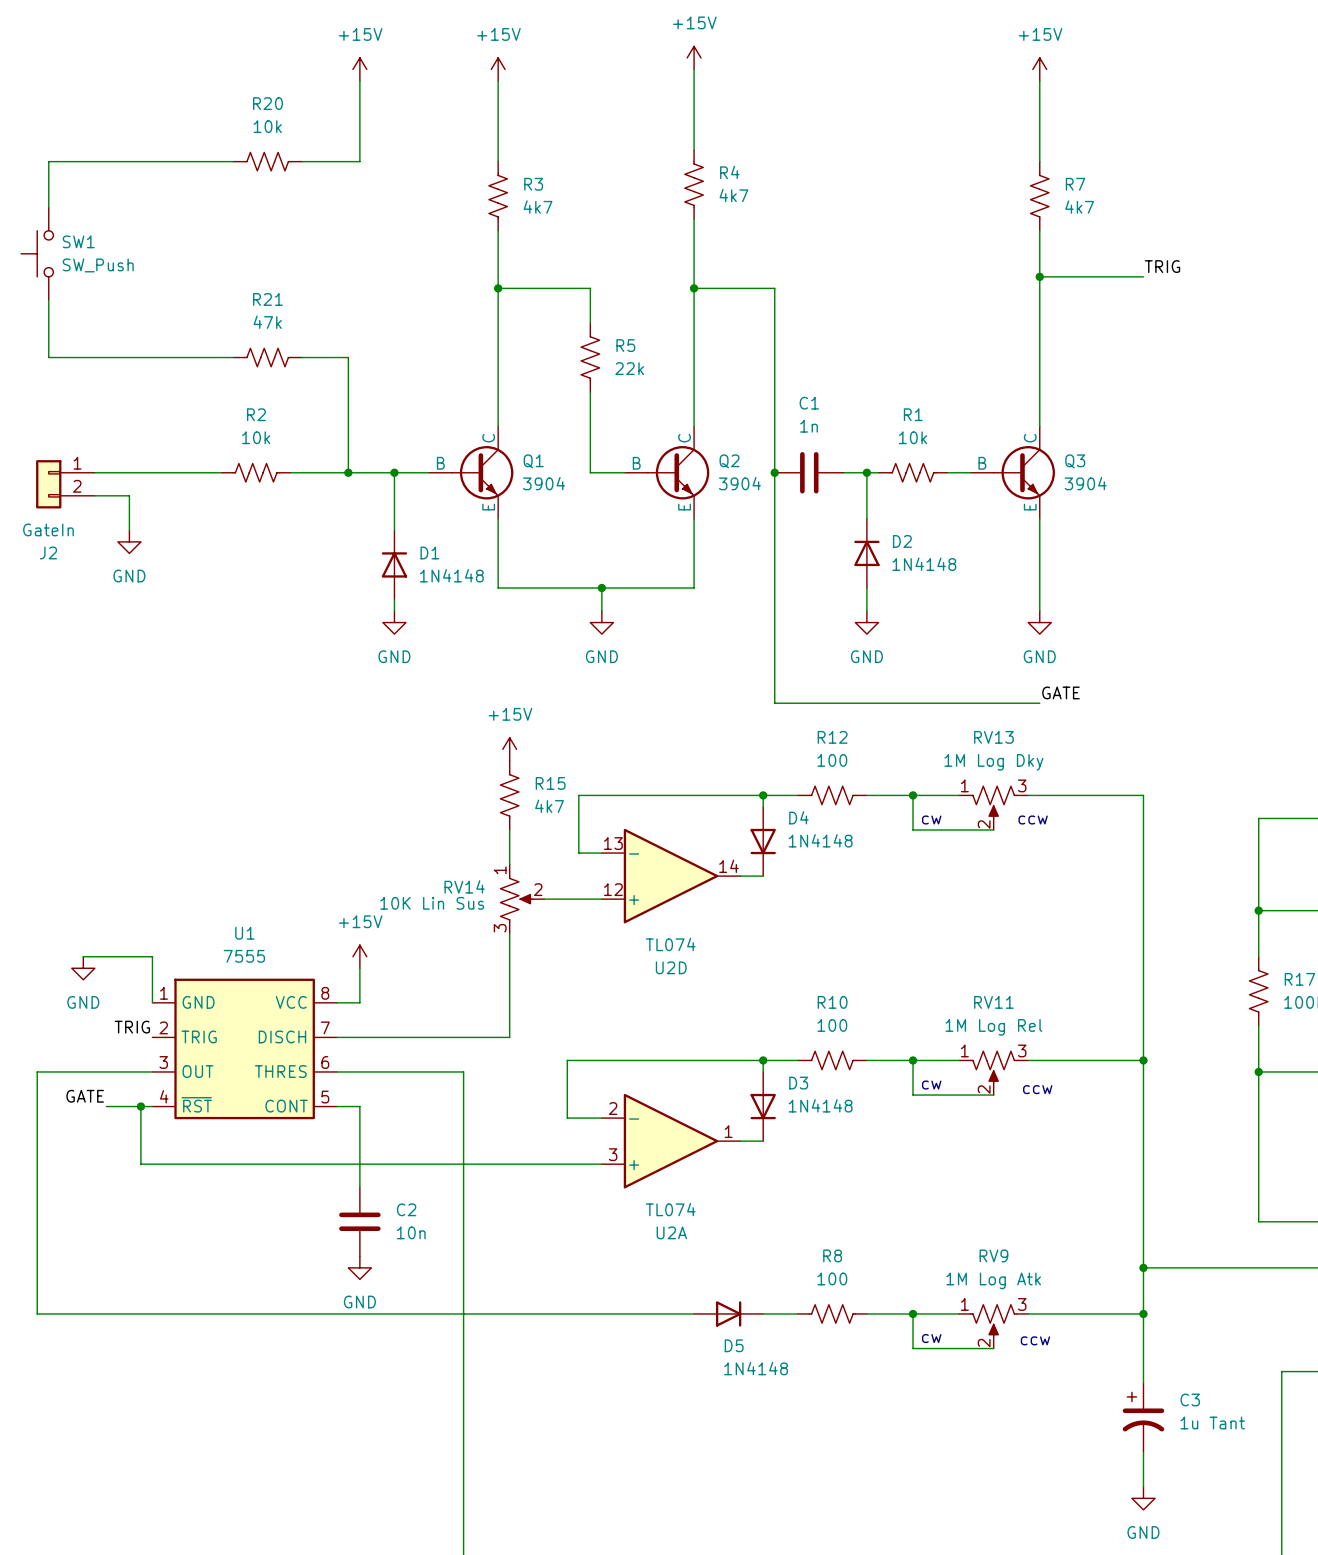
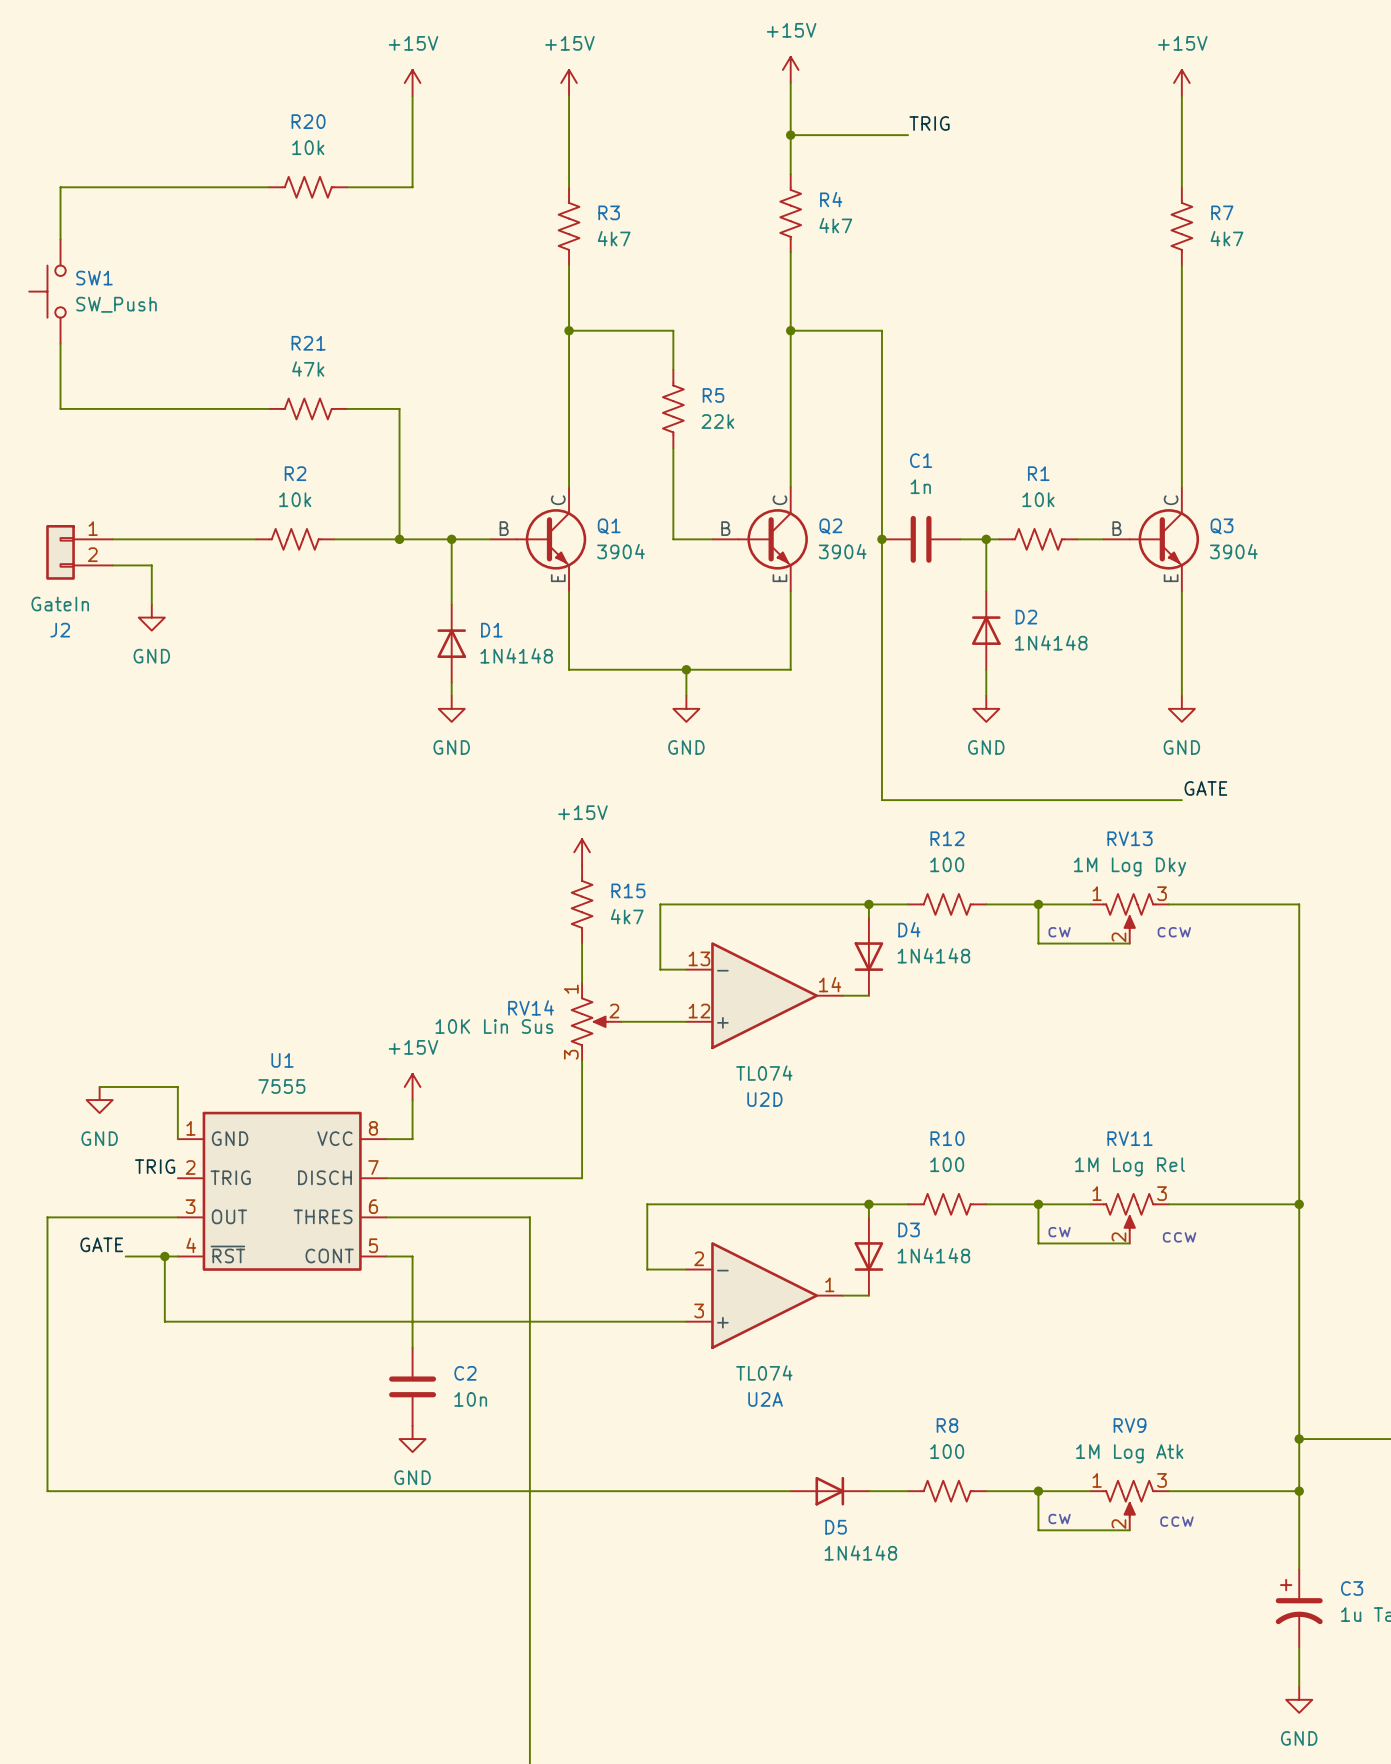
label: none -> TRIG (929, 123)
wire: none -> (790, 135) (908, 135)
junction: none -> (790, 135)
label: TRIG (1162, 266) -> none
wire: (1039, 276) (1143, 276) -> none
junction: (1039, 276) -> none

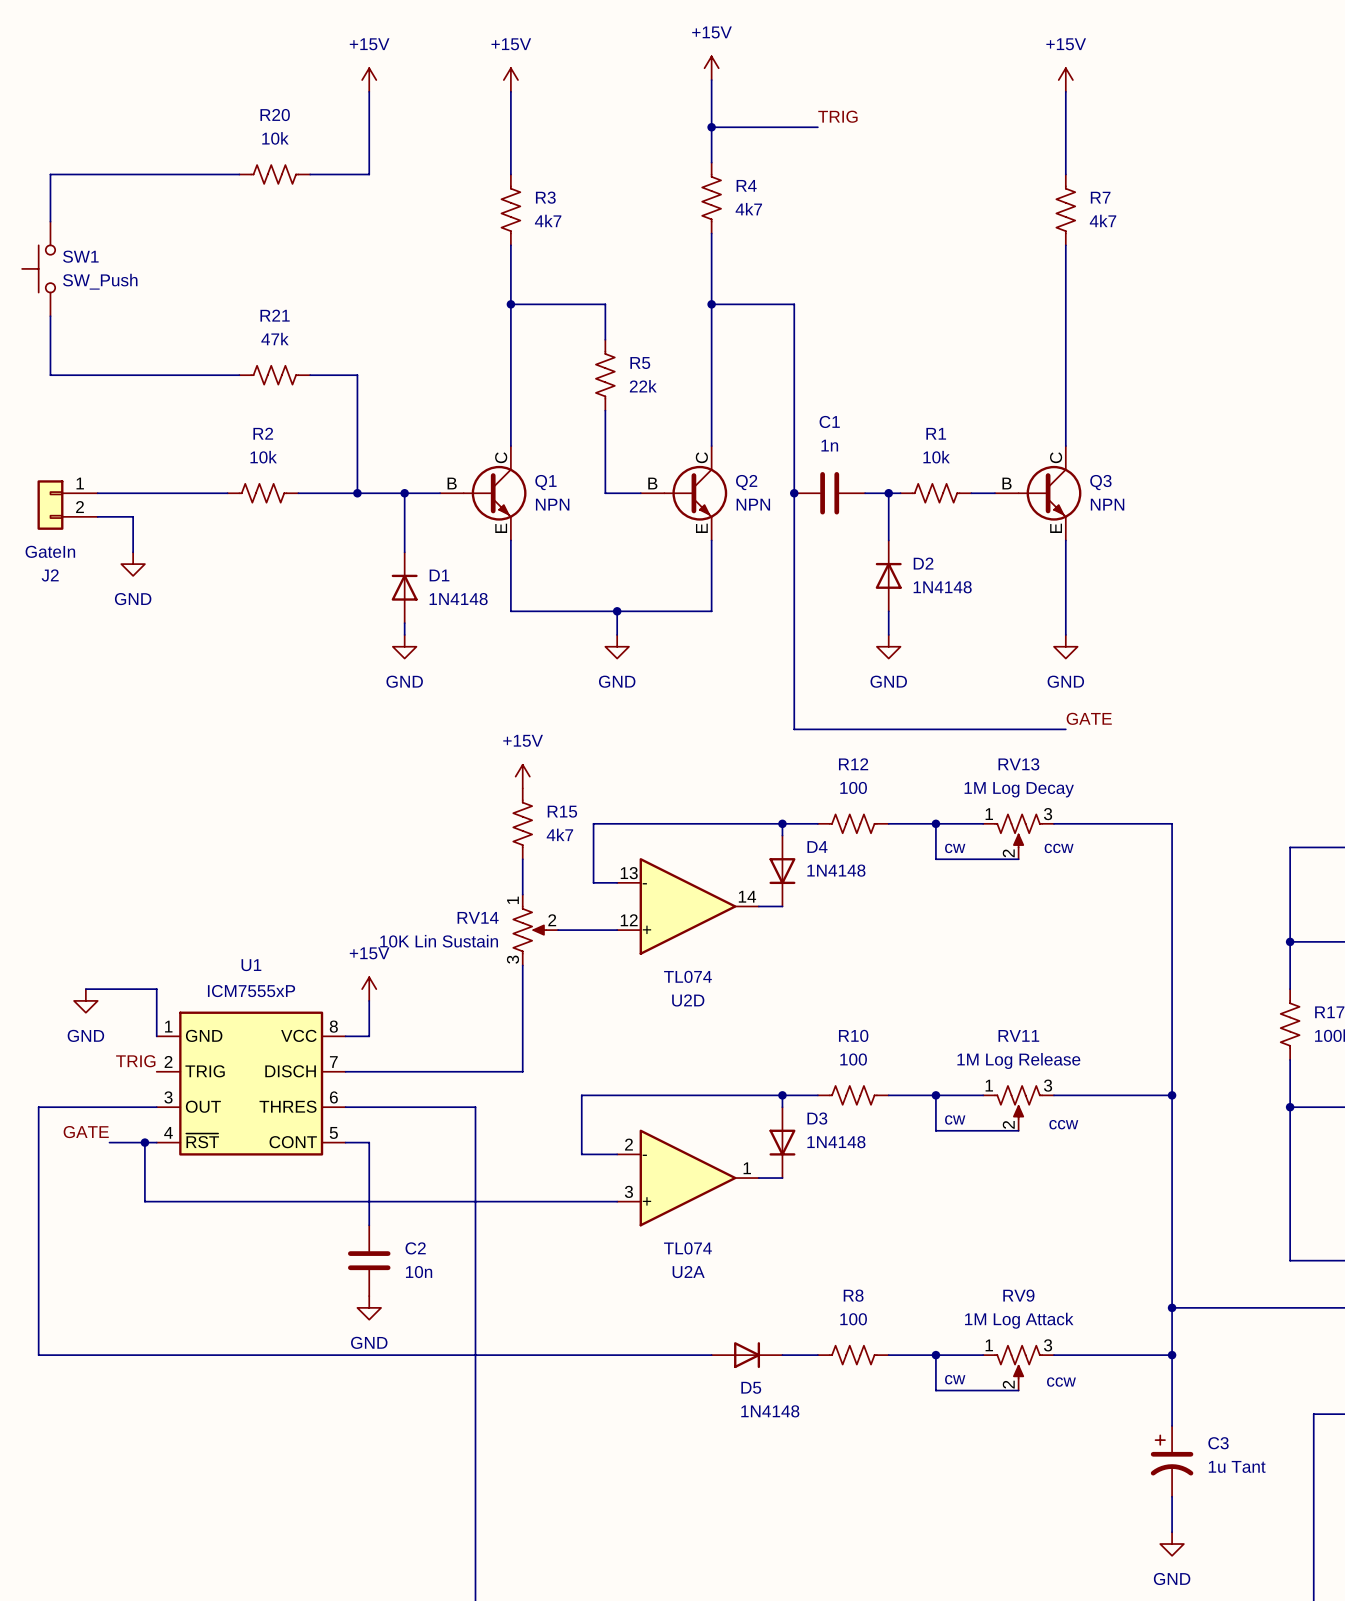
Q1 value: 3904 (620, 551) -> NPN (552, 504)
Q2 value: 3904 (842, 551) -> NPN (753, 504)
Q3 value: 3904 (1233, 551) -> NPN (1107, 504)
RV13 value: 1M Log Dky (1130, 867) -> 1M Log Decay (1019, 789)
RV14 value: 10K Lin Sus (494, 1026) -> 10K Lin Sustain (439, 941)
U1 value: 7555 (281, 1086) -> ICM7555xP (251, 991)
RV11 value: 1M Log Rel (1130, 1166) -> 1M Log Release (1018, 1060)
RV9 value: 1M Log Atk (1129, 1453) -> 1M Log Attack (1019, 1320)

